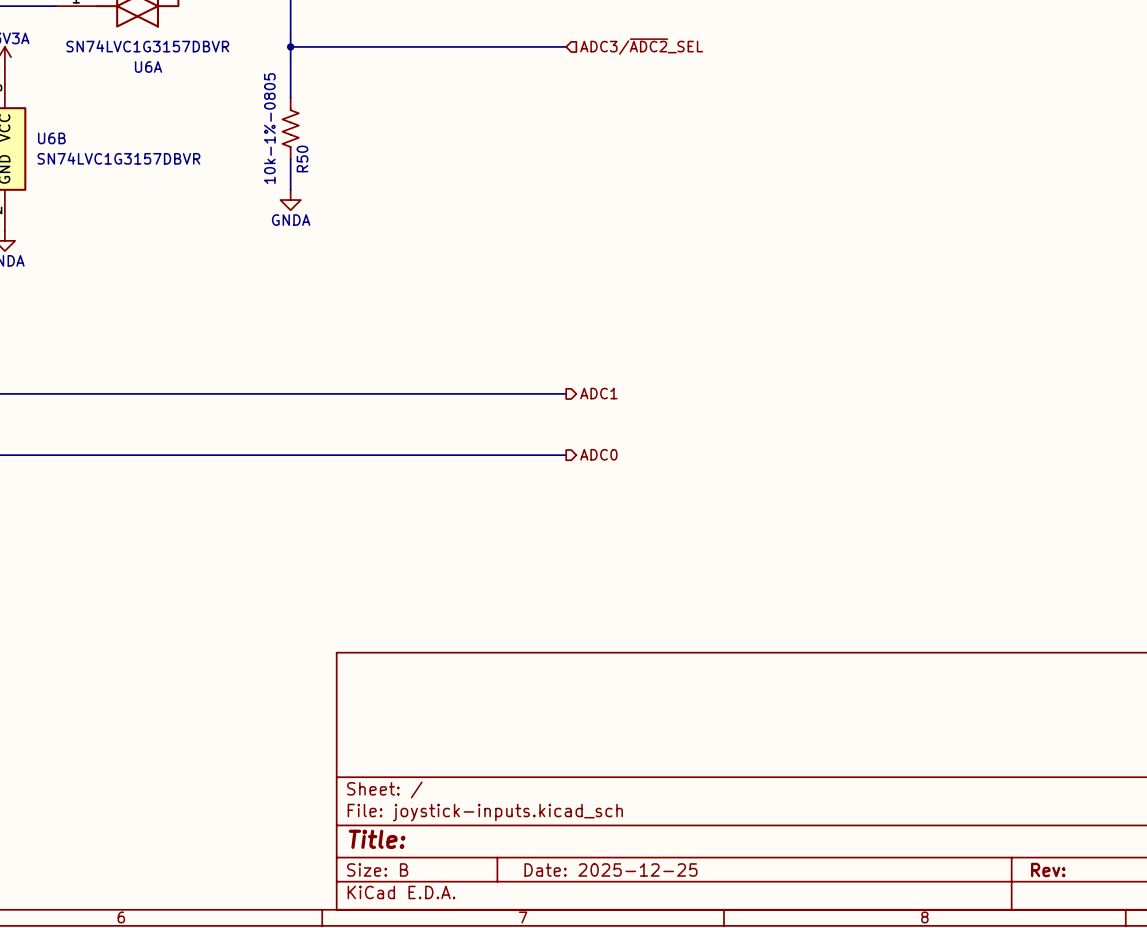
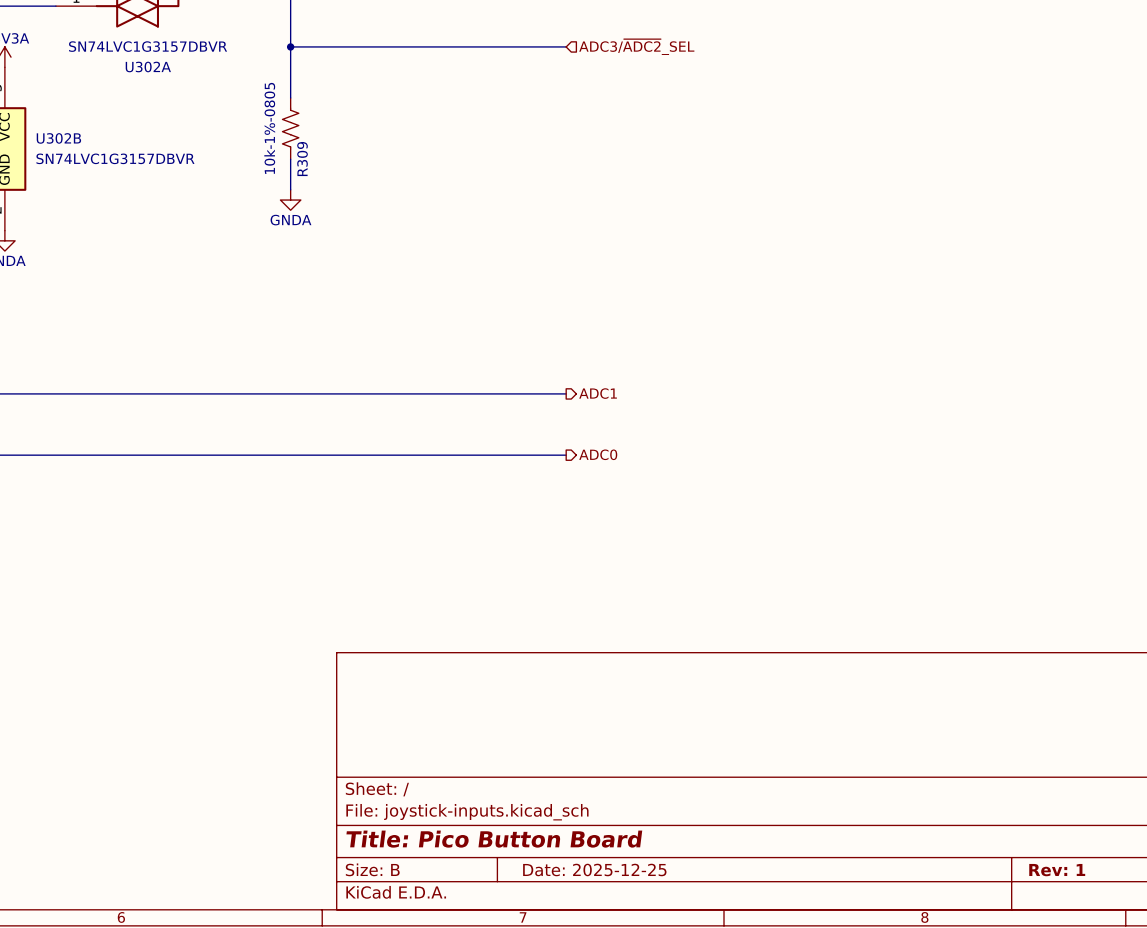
U6A name: U6A (148, 66) -> U302A (148, 66)
U6B name: U6B (51, 138) -> U302B (58, 138)
R50 name: R50 (302, 158) -> R309 (302, 159)
title block: Title: (377, 839) -> Title: Pico Button Board (494, 839)
title block: Rev: (1048, 869) -> Rev: 1 (1057, 870)

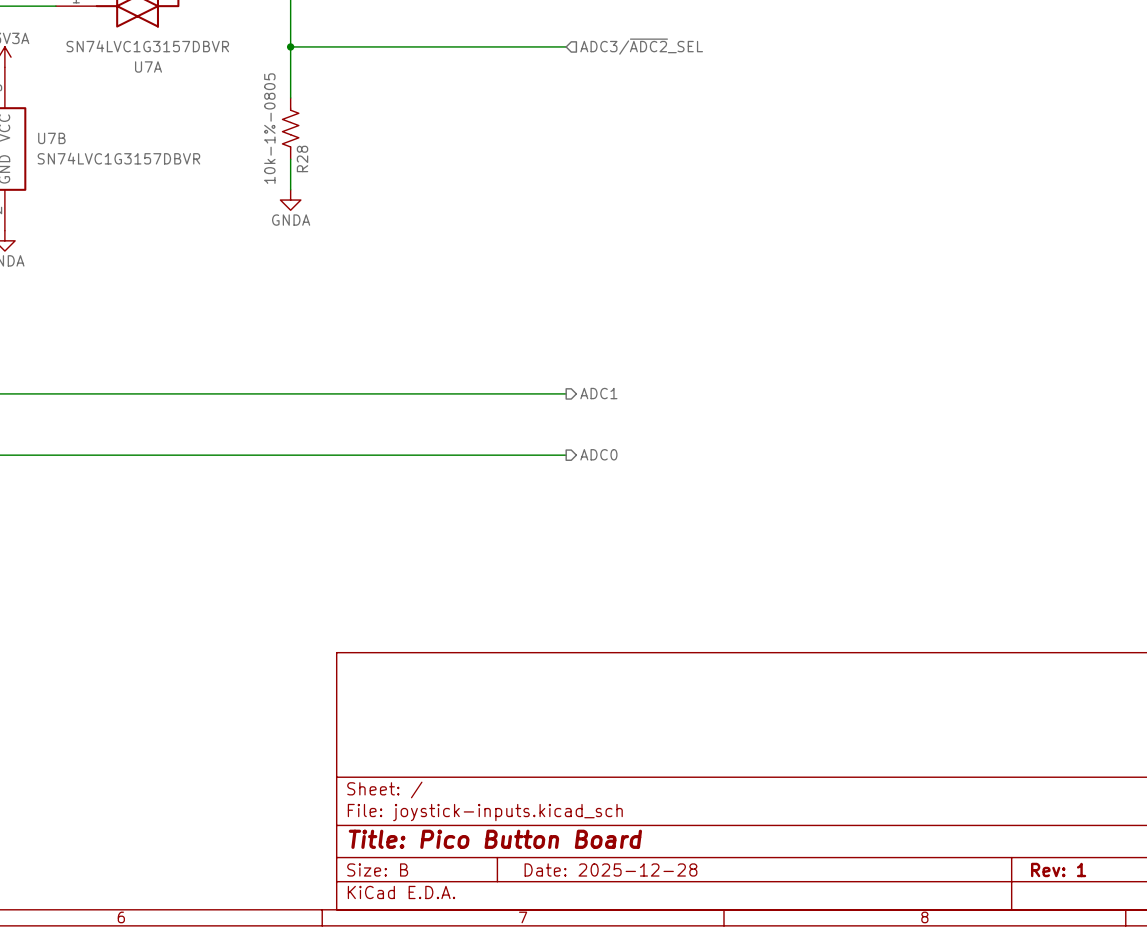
U302A name: U302A (148, 66) -> U7A (148, 66)
U302B name: U302B (58, 138) -> U7B (51, 138)
R309 name: R309 (302, 159) -> R28 (302, 158)
title block: Date: 2025-12-25 (594, 869) -> Date: 2025-12-28 (610, 869)

